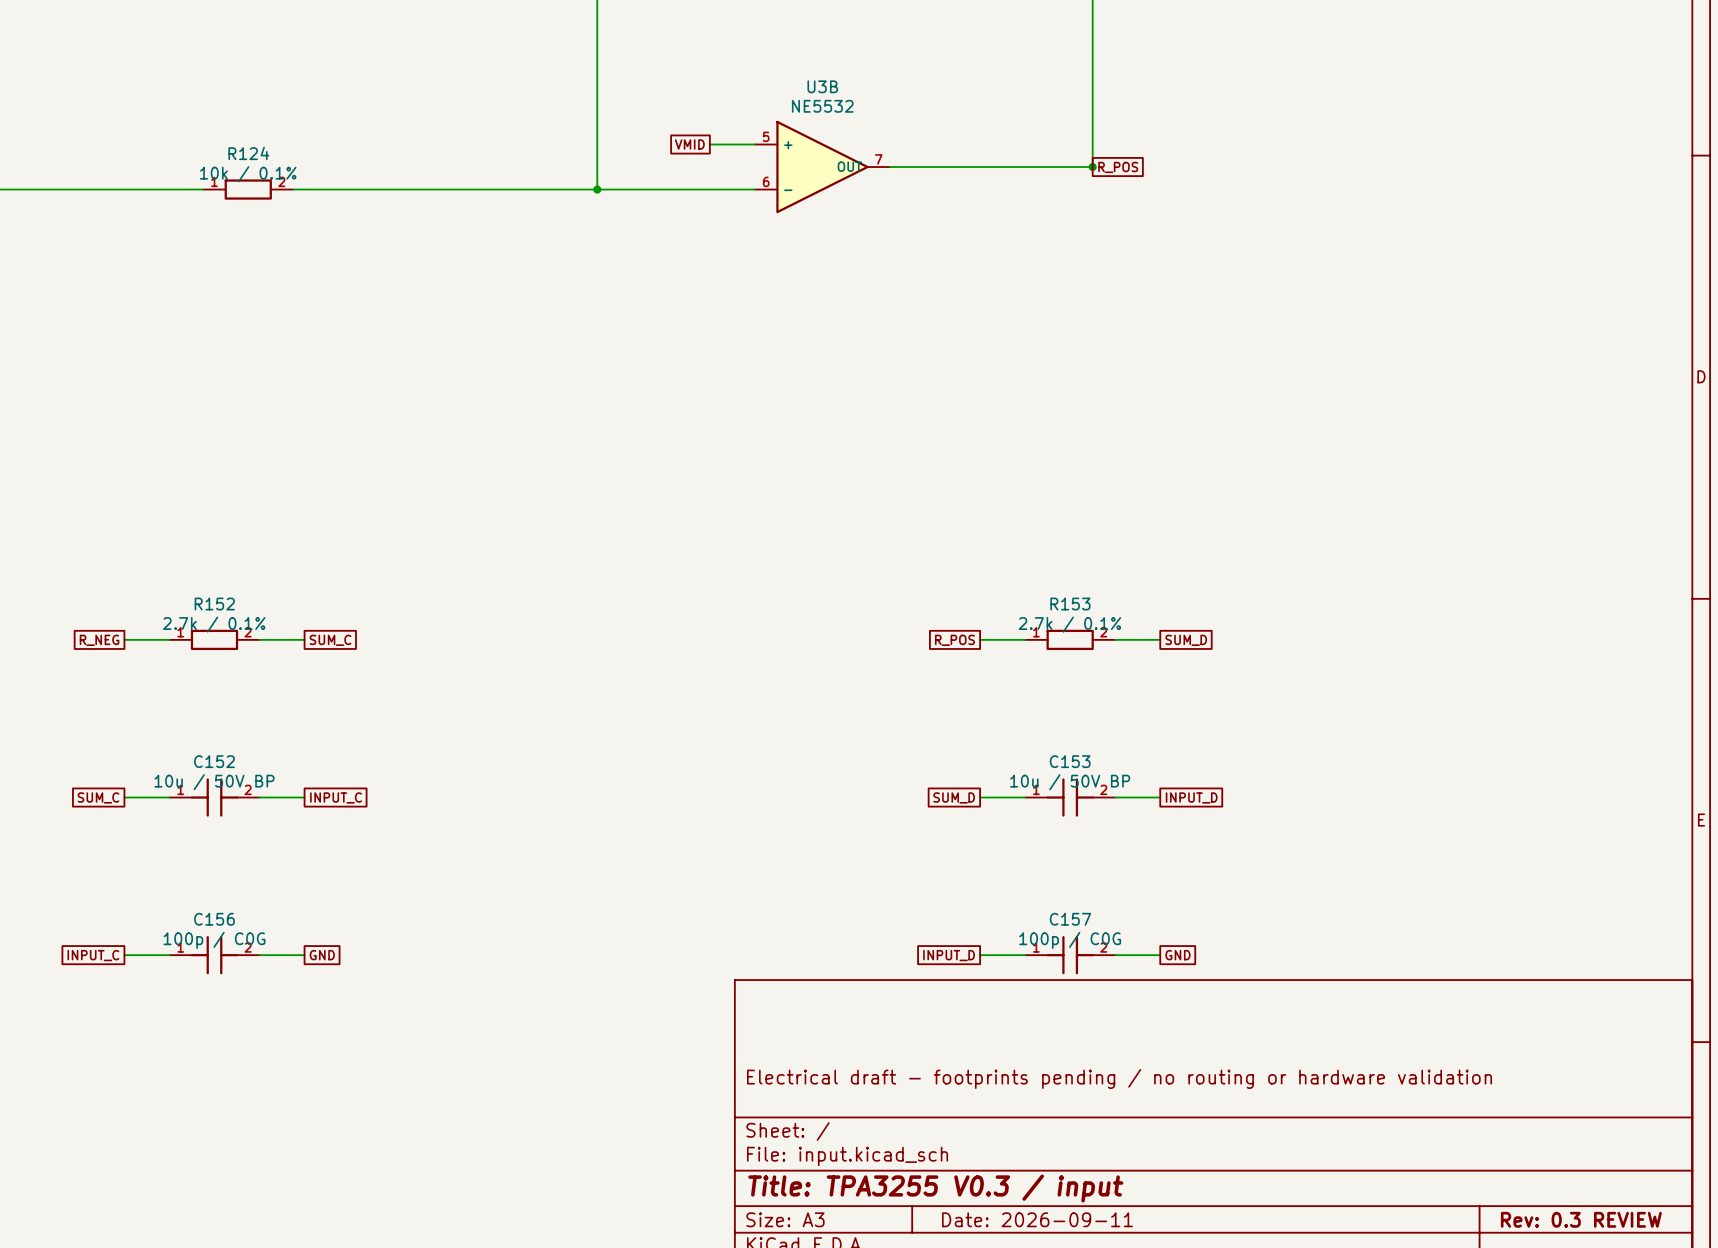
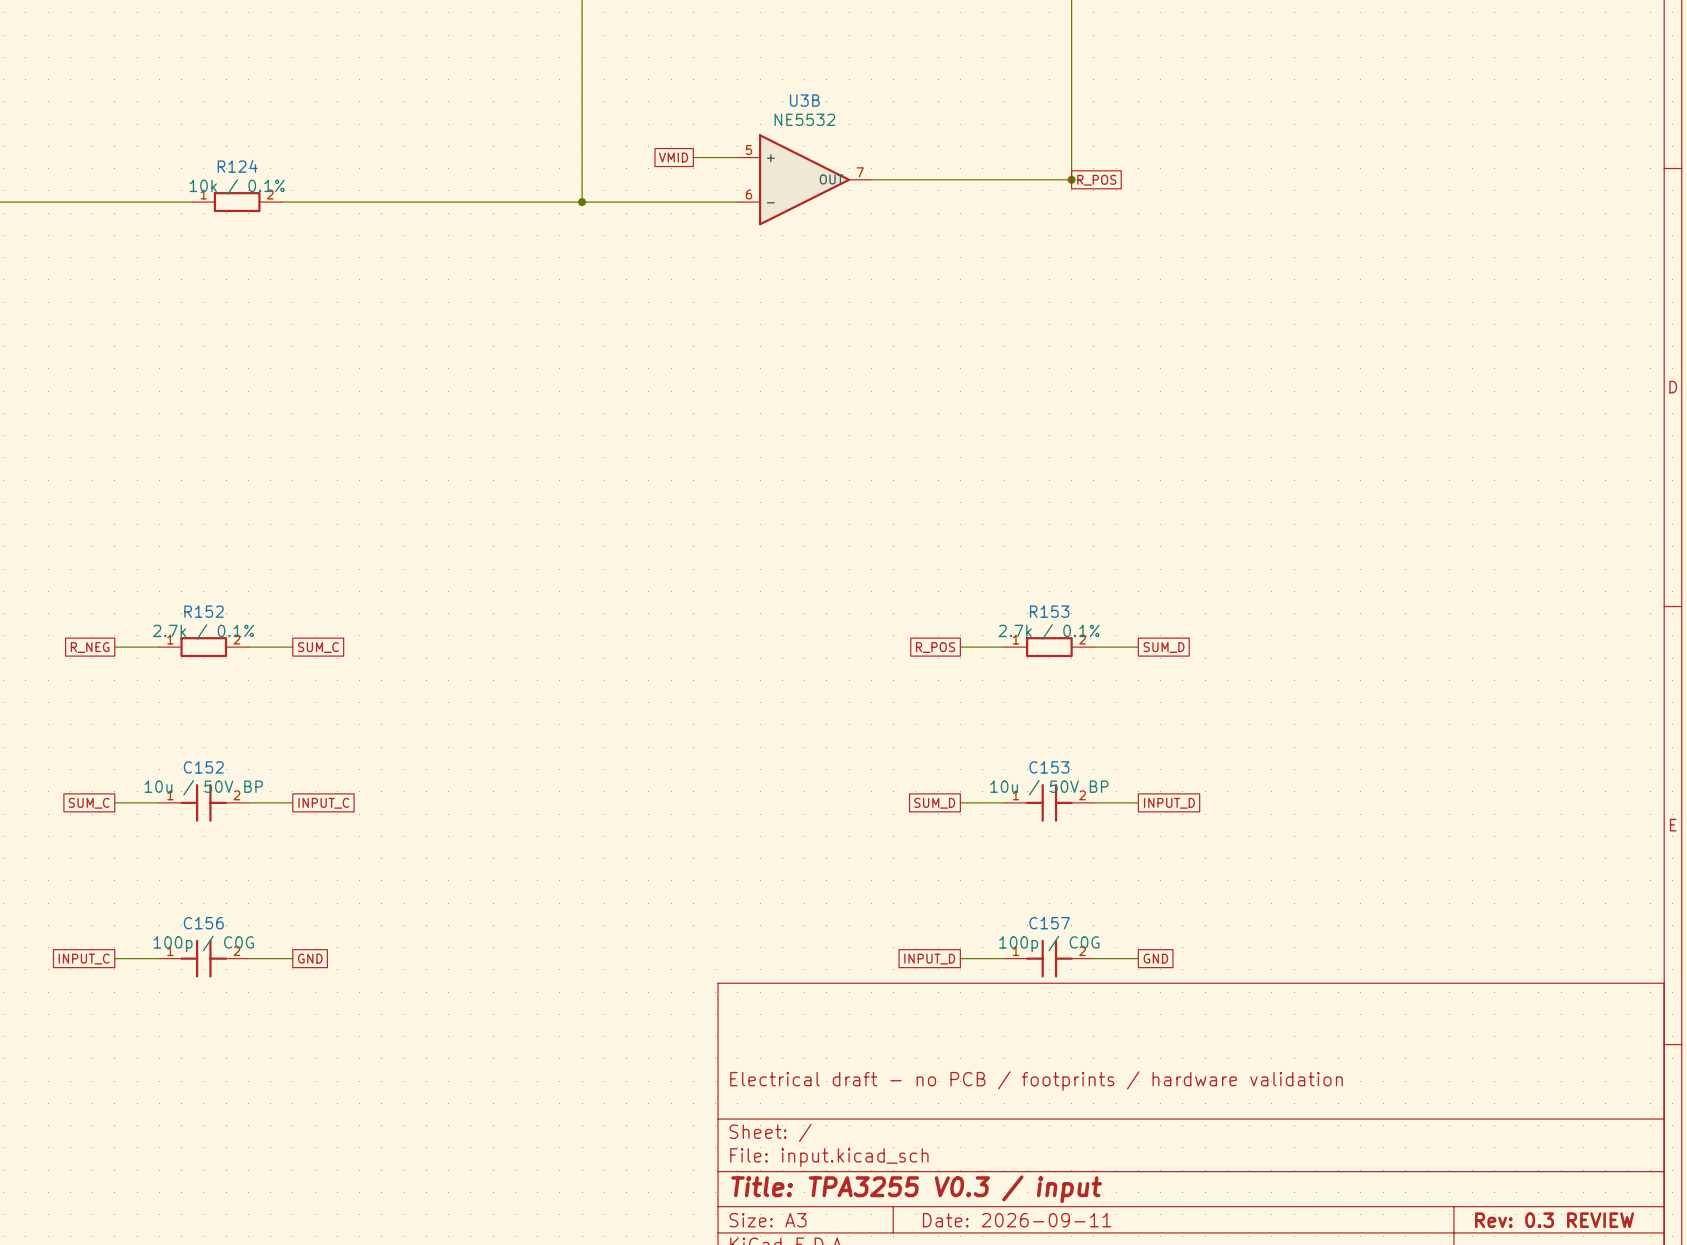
title block: Electrical draft - footprints pending / no routing or hardware validation (1119, 1078) -> Electrical draft - no PCB / footprints / hardware validation (1036, 1081)

